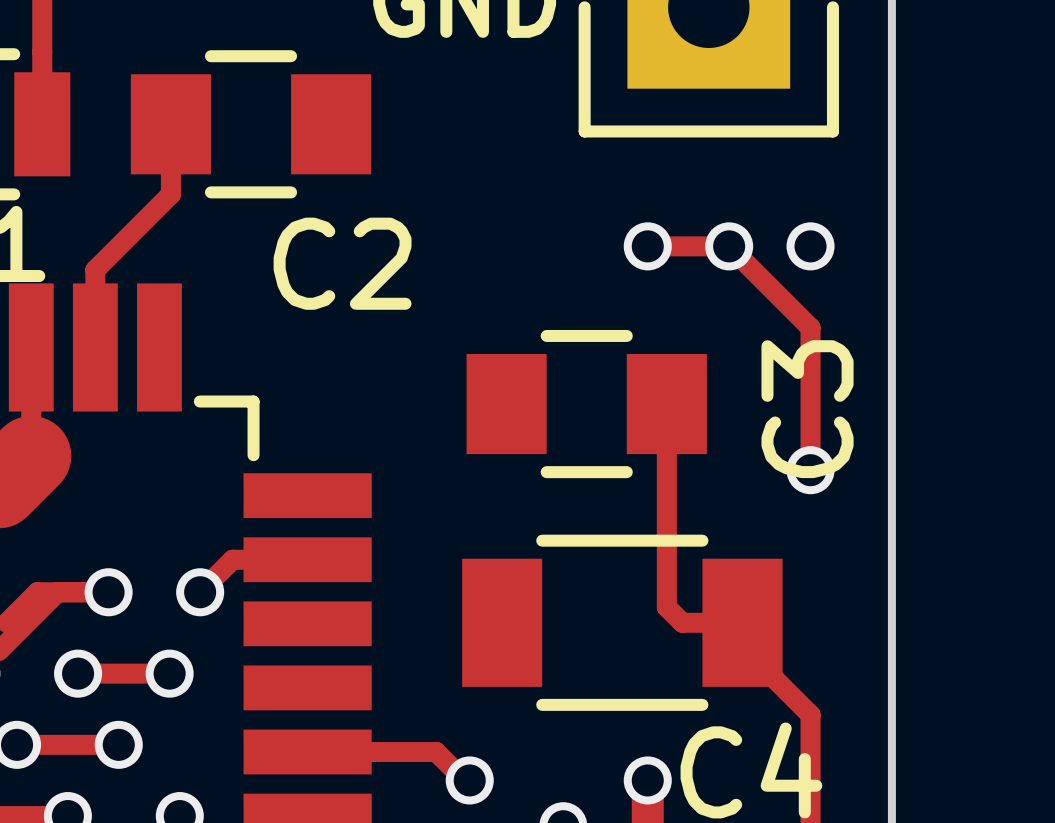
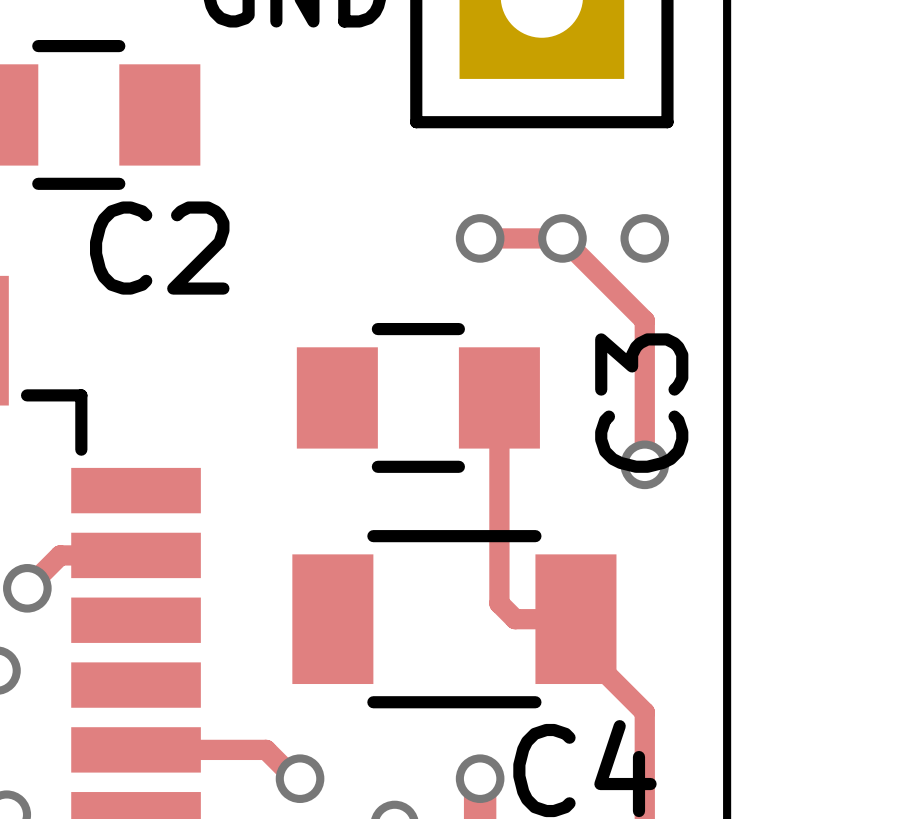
C2 name position: C2 (342, 263) -> C2 (159, 248)

